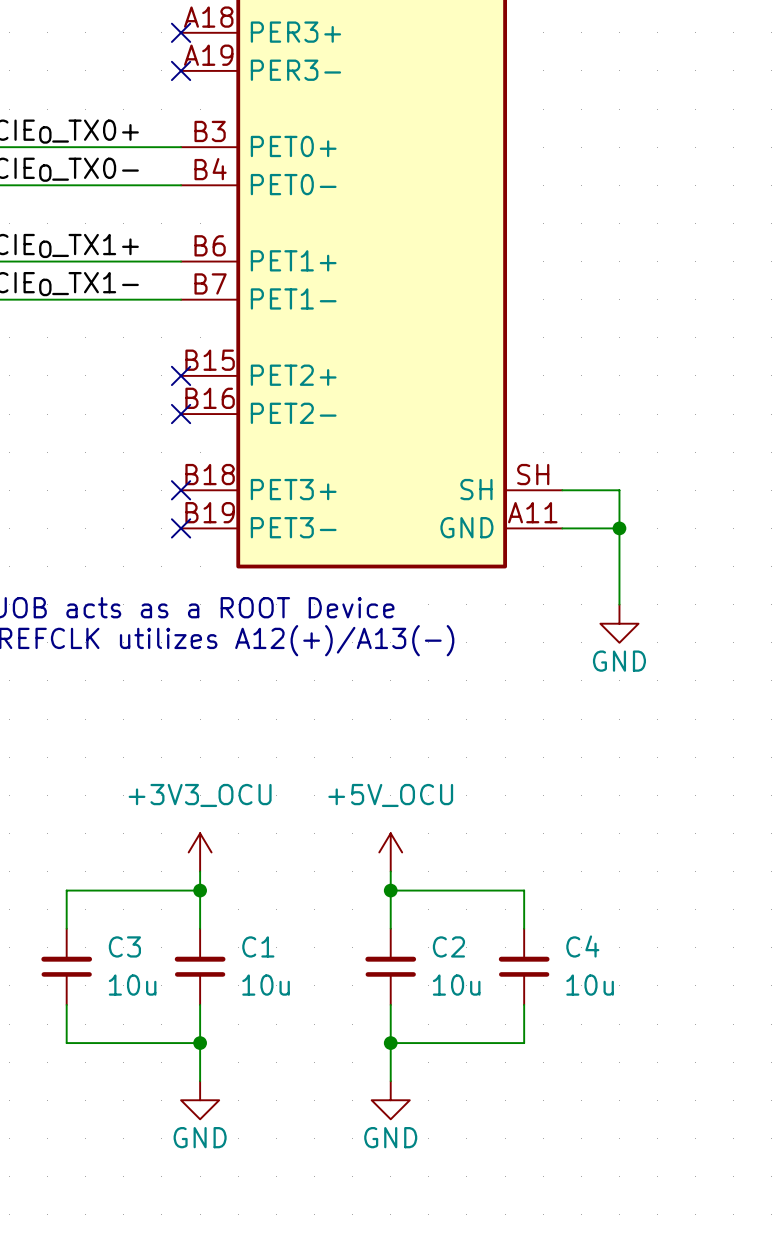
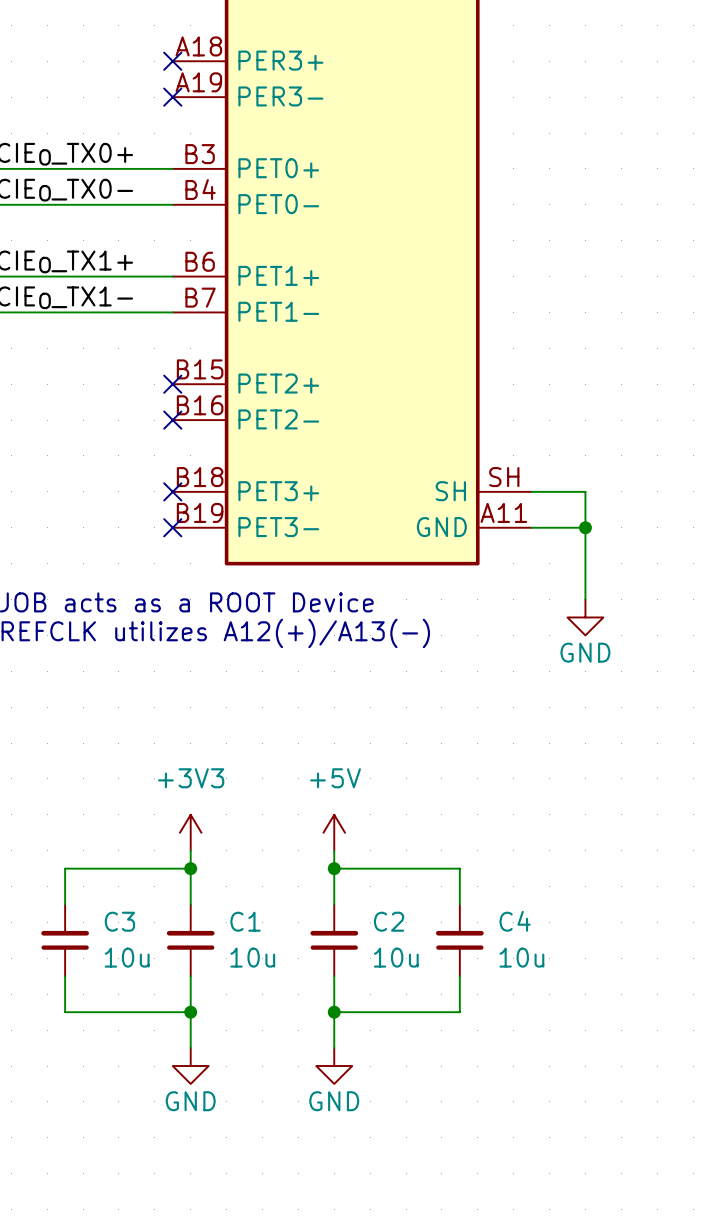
power symbol: +3V3_OCU (200, 852) -> +3V3 (190, 832)
power symbol: none -> +5V (334, 832)
power symbol: +5V_OCU (390, 852) -> none
wire: (390, 871) (390, 928) -> (334, 850) (334, 904)
wire: none -> (334, 868) (370, 868)
junction position: (390, 890) -> (334, 868)
wire: (486, 890) (524, 890) (524, 928) -> (459, 868) (459, 904)
C2 position: (390, 966) -> (334, 940)
C4 position: (524, 966) -> (459, 940)
wire: (390, 1004) (390, 1081) -> (334, 976) (334, 1048)
wire: (524, 1004) (524, 1043) (486, 1043) -> (459, 976) (459, 1012)
wire: none -> (334, 1012) (370, 1012)
junction position: (390, 1043) -> (334, 1012)
power symbol position: GND (390, 1100) -> GND (334, 1066)

